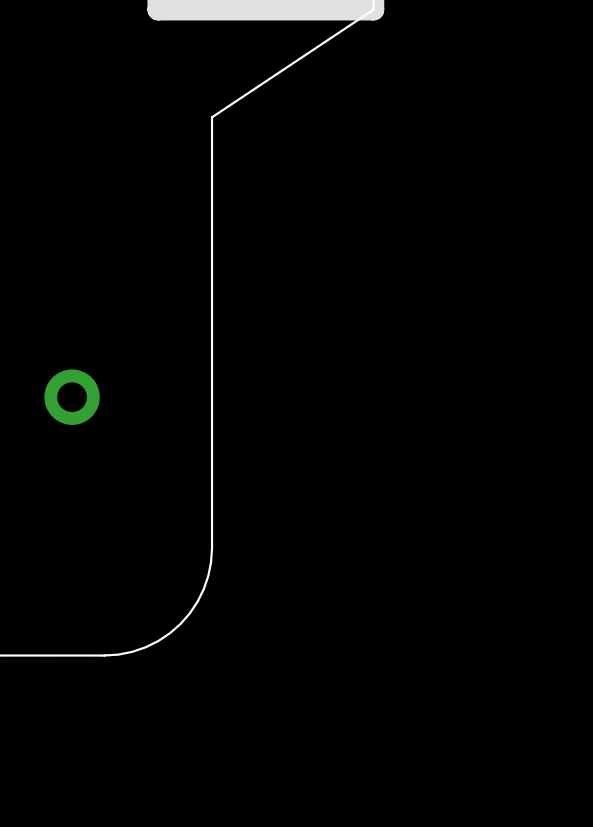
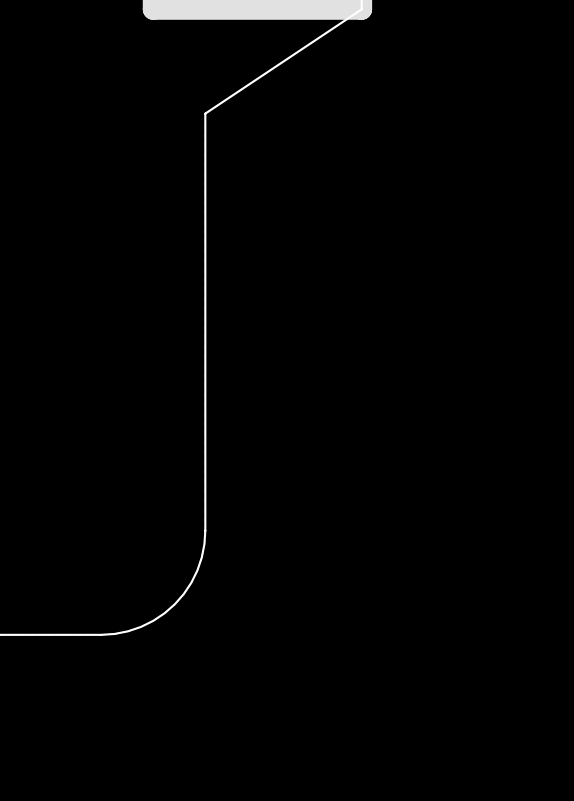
via: (72, 397) -> none

